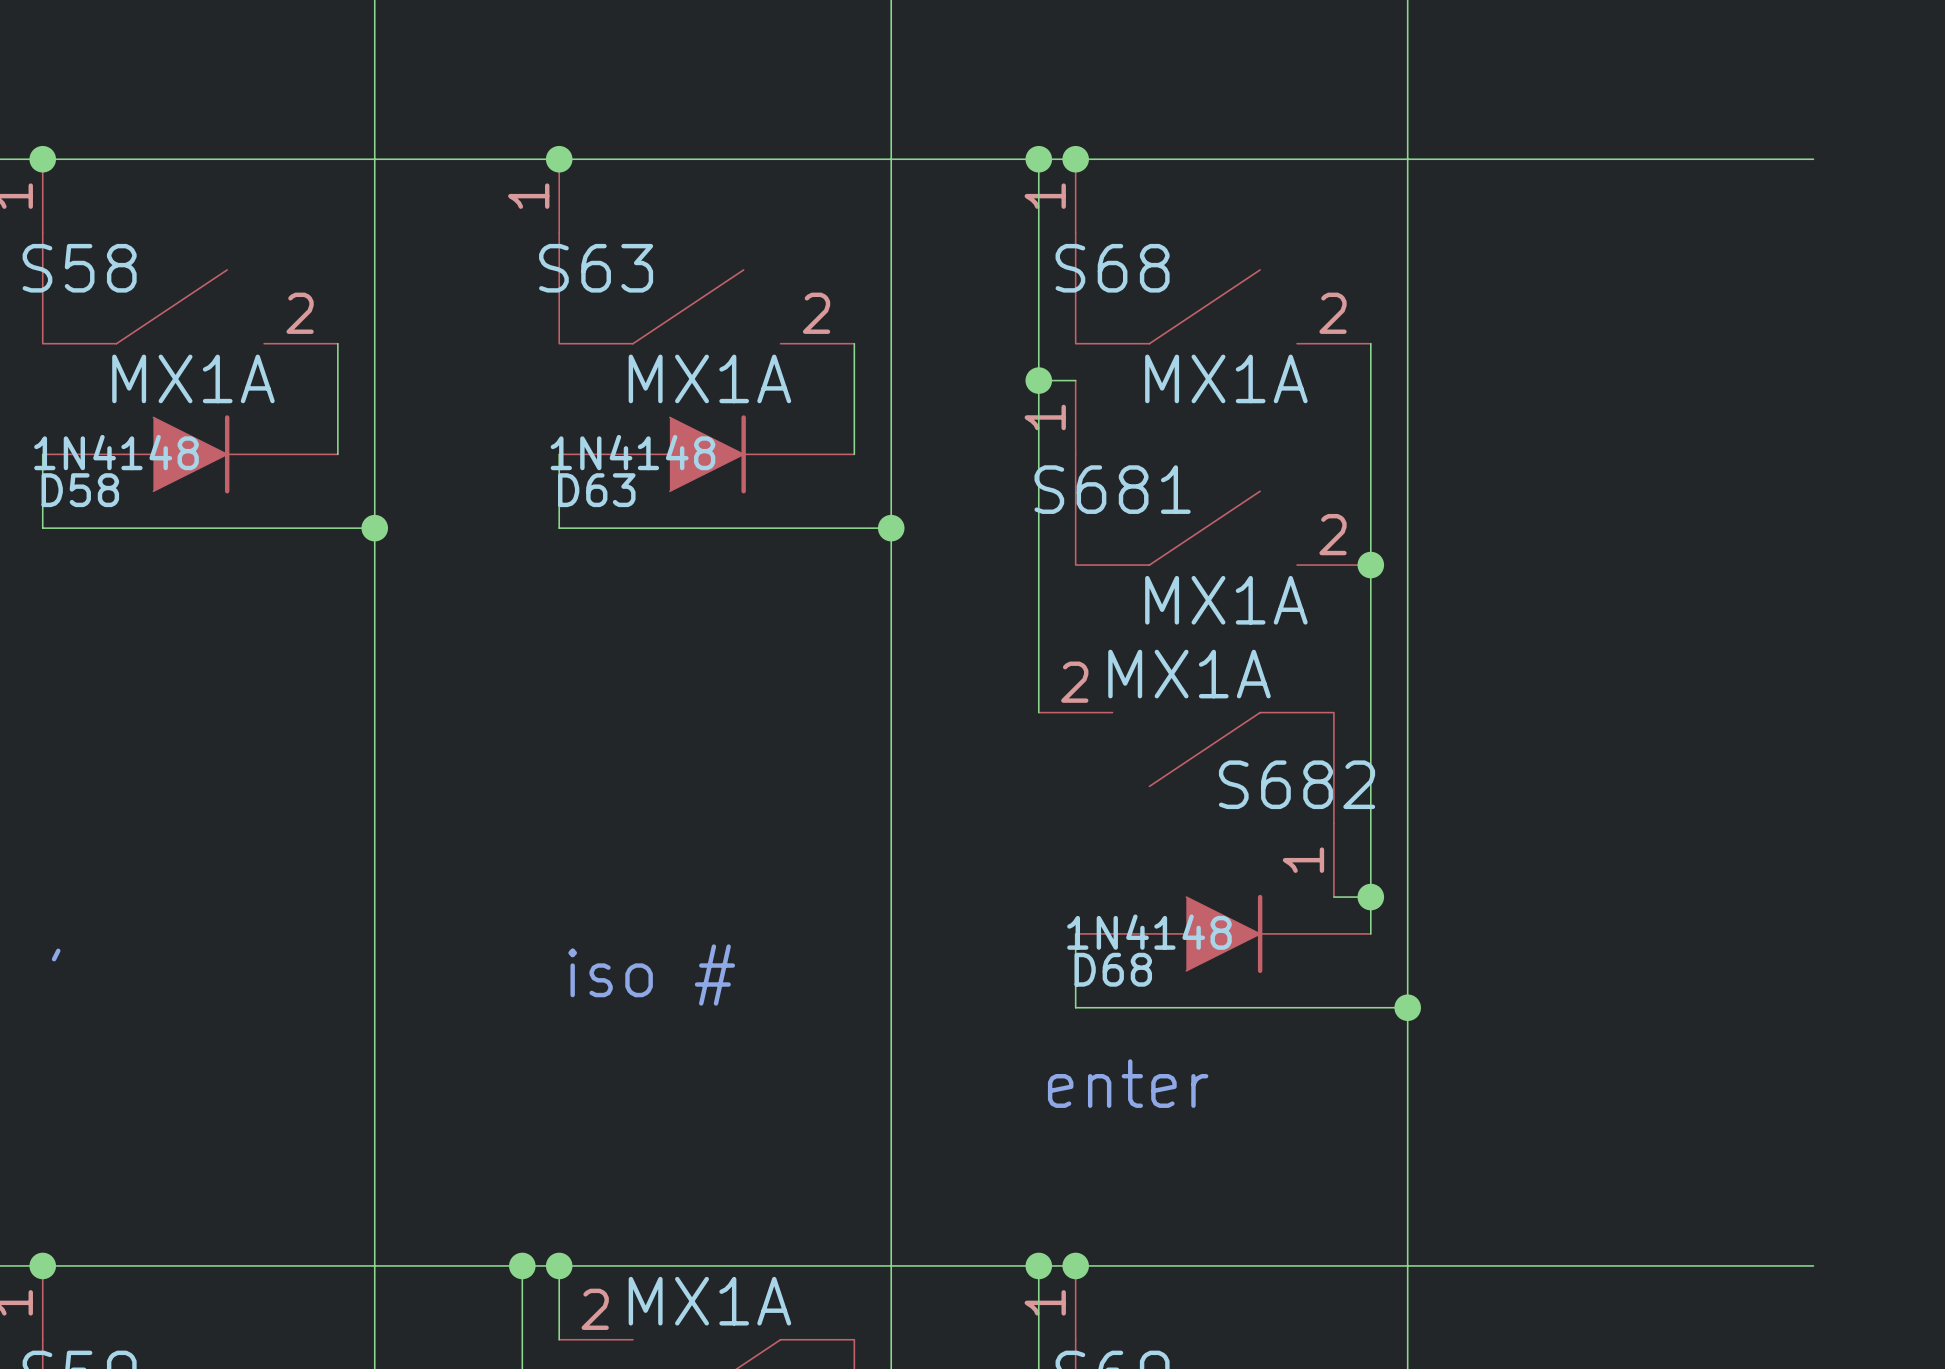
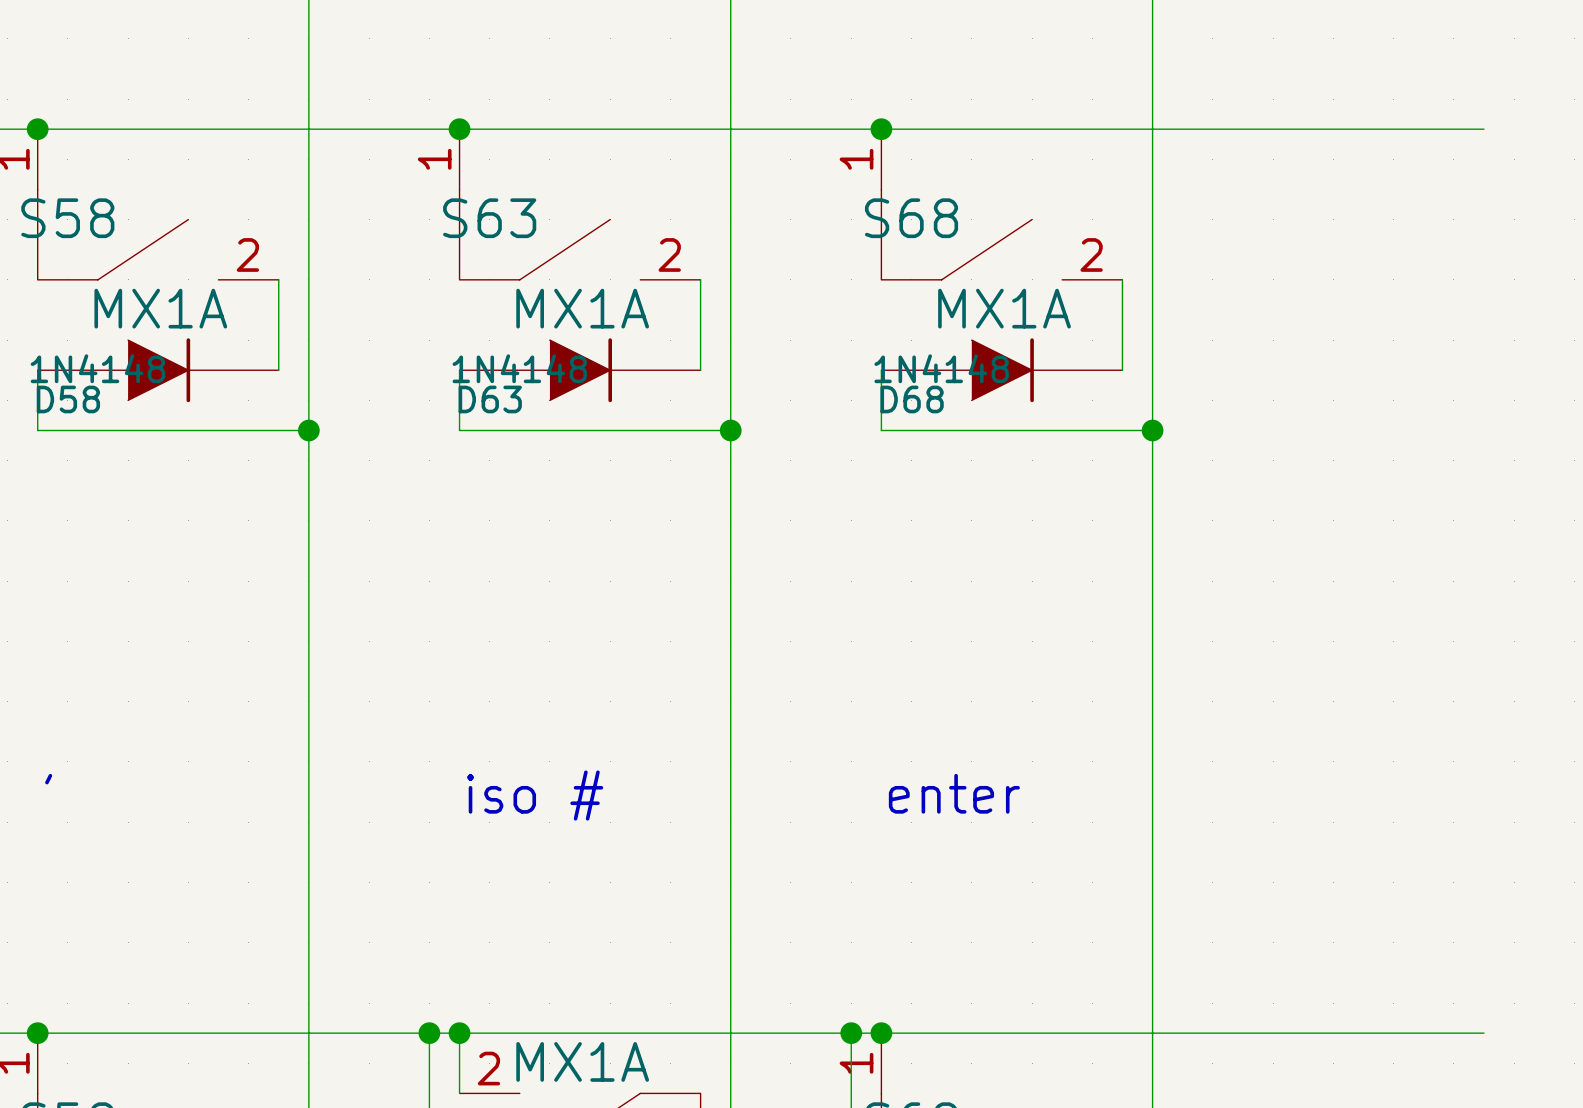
wire: (1038, 159) (1038, 712) -> none
junction: (1038, 159) -> none
wire: (1038, 380) (1075, 380) -> none
junction: (1038, 380) -> none
wire: (1370, 454) (1370, 933) -> none
S681: MX1A (1223, 472) -> none
junction position: (1370, 565) -> (1152, 430)
S682: MX1A (1186, 804) -> none
wire: (1333, 897) (1370, 897) -> none
junction: (1370, 897) -> none
wire: (1075, 933) (1075, 1007) (1407, 1007) -> (881, 370) (881, 430) (1152, 430)
D68 position: (1223, 933) -> (1001, 370)
junction: (1407, 1007) -> none
text position: enter (1128, 1083) -> enter (954, 793)

